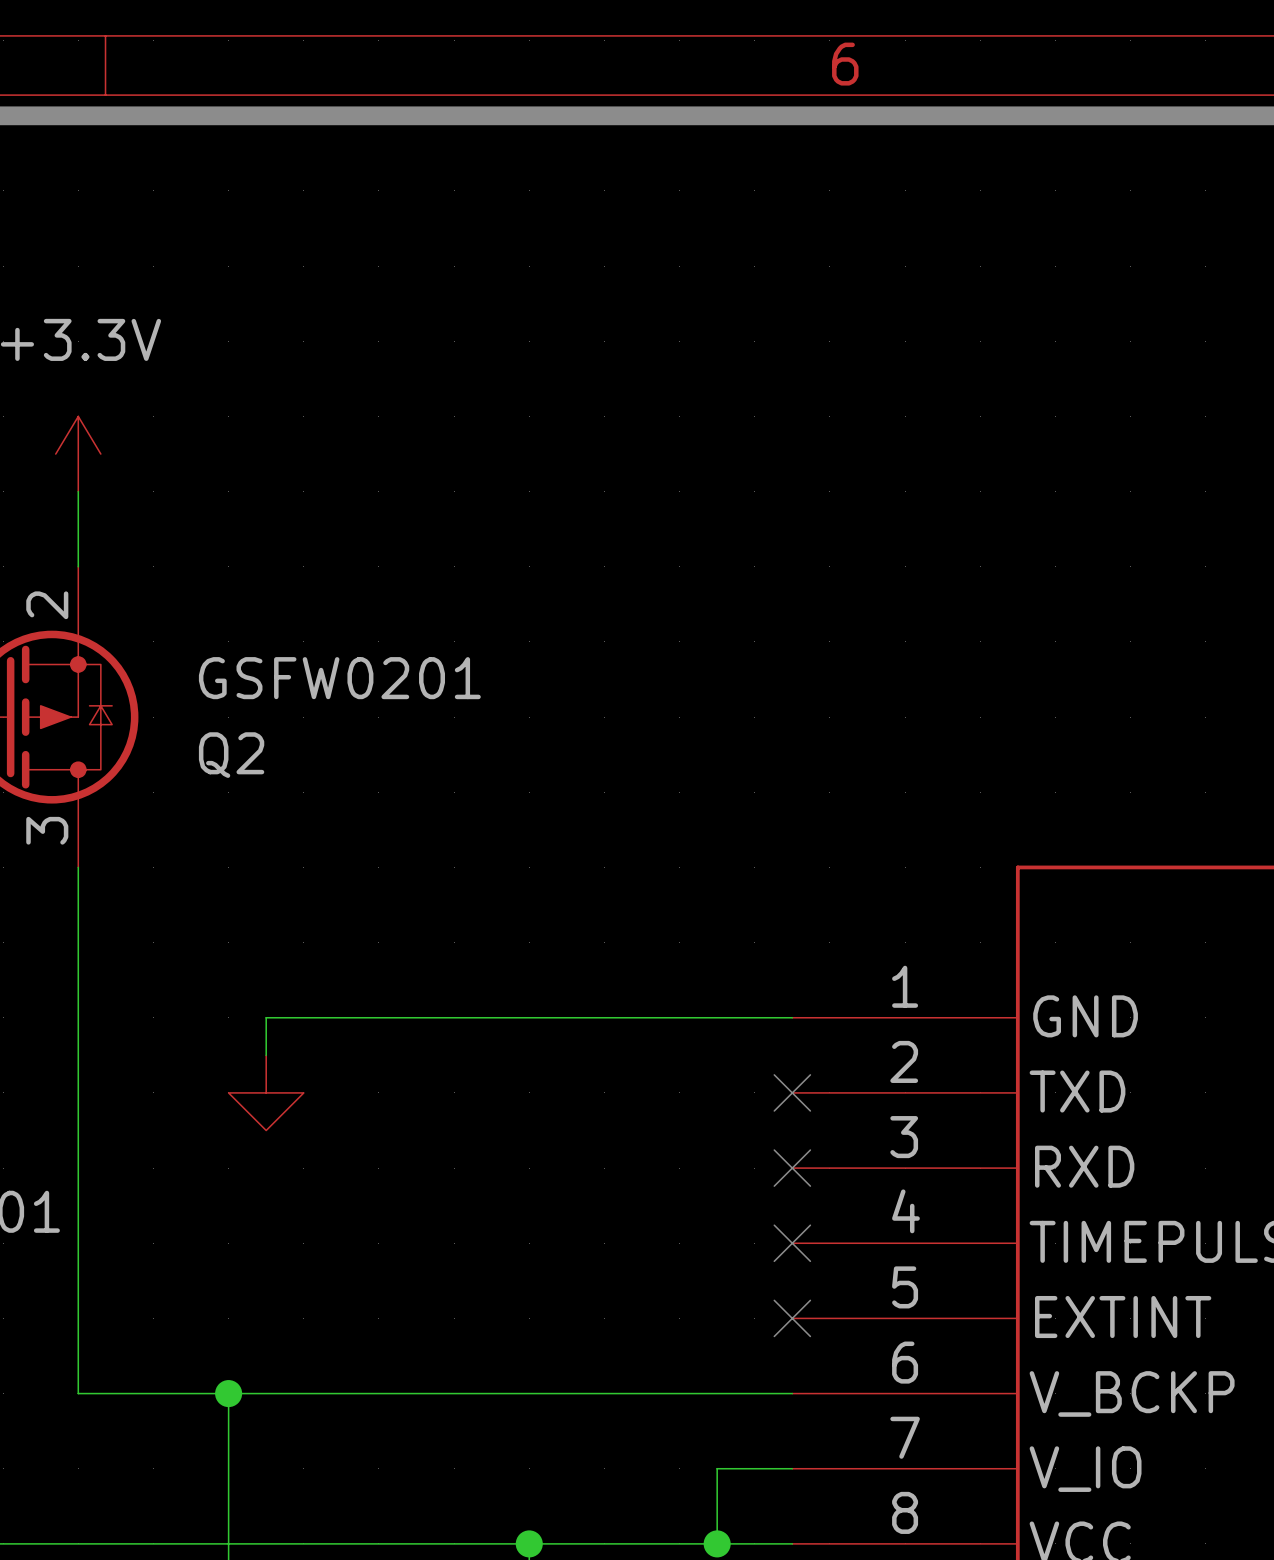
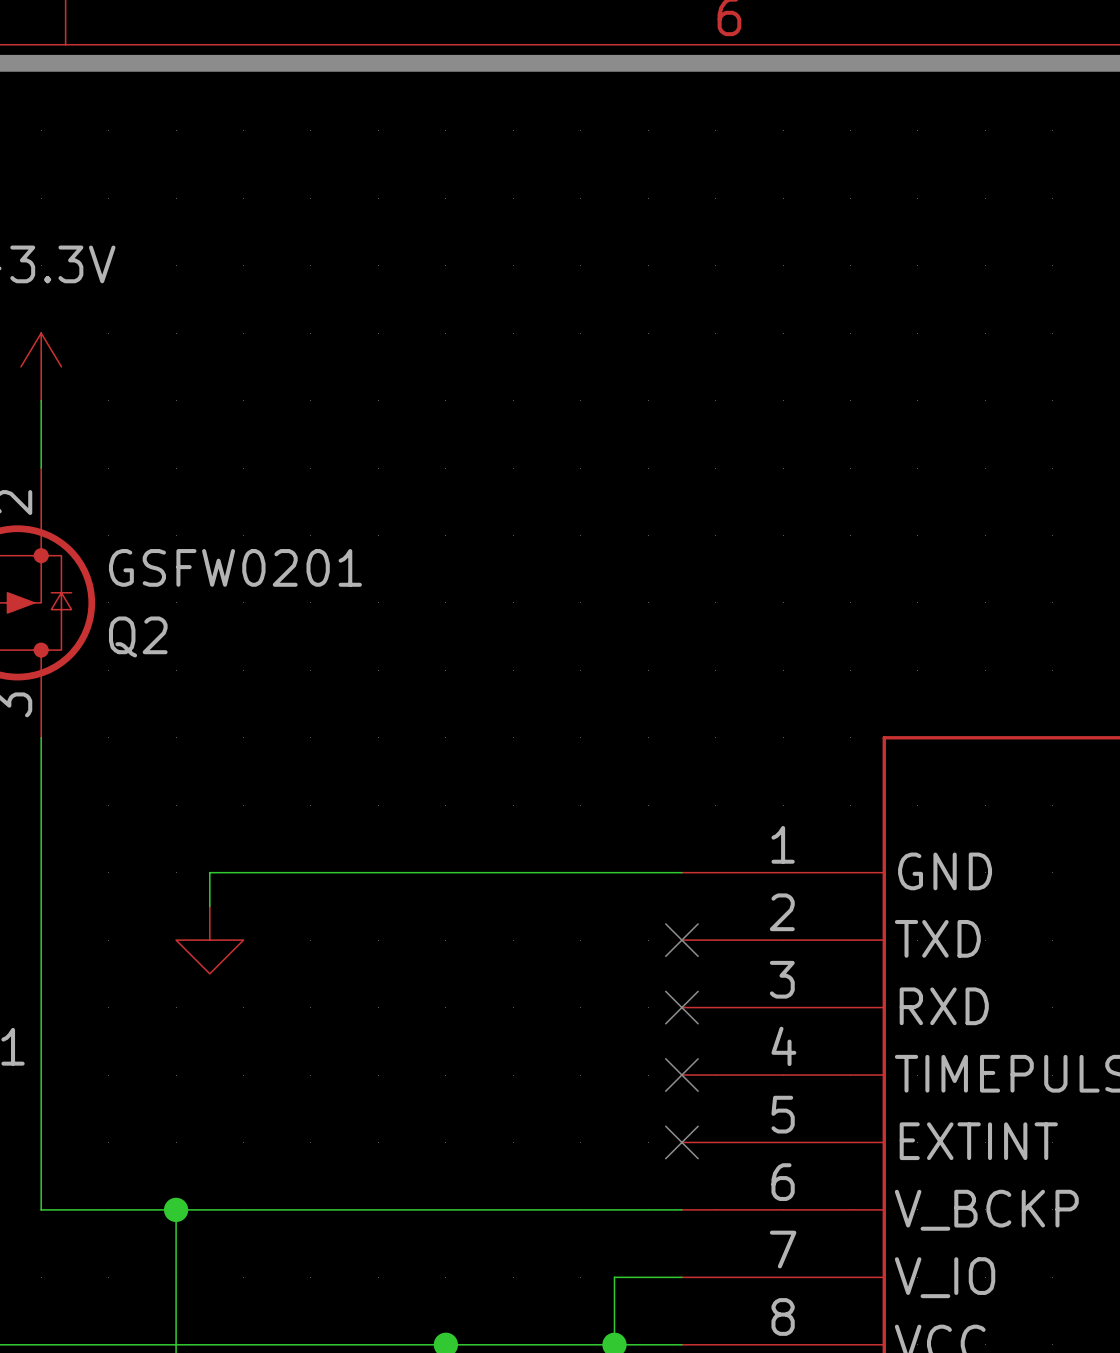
Q2 value position: GSFW0201 (339, 678) -> GSFW0201 (235, 567)
Q2 name position: Q2 (231, 755) -> Q2 (138, 636)

